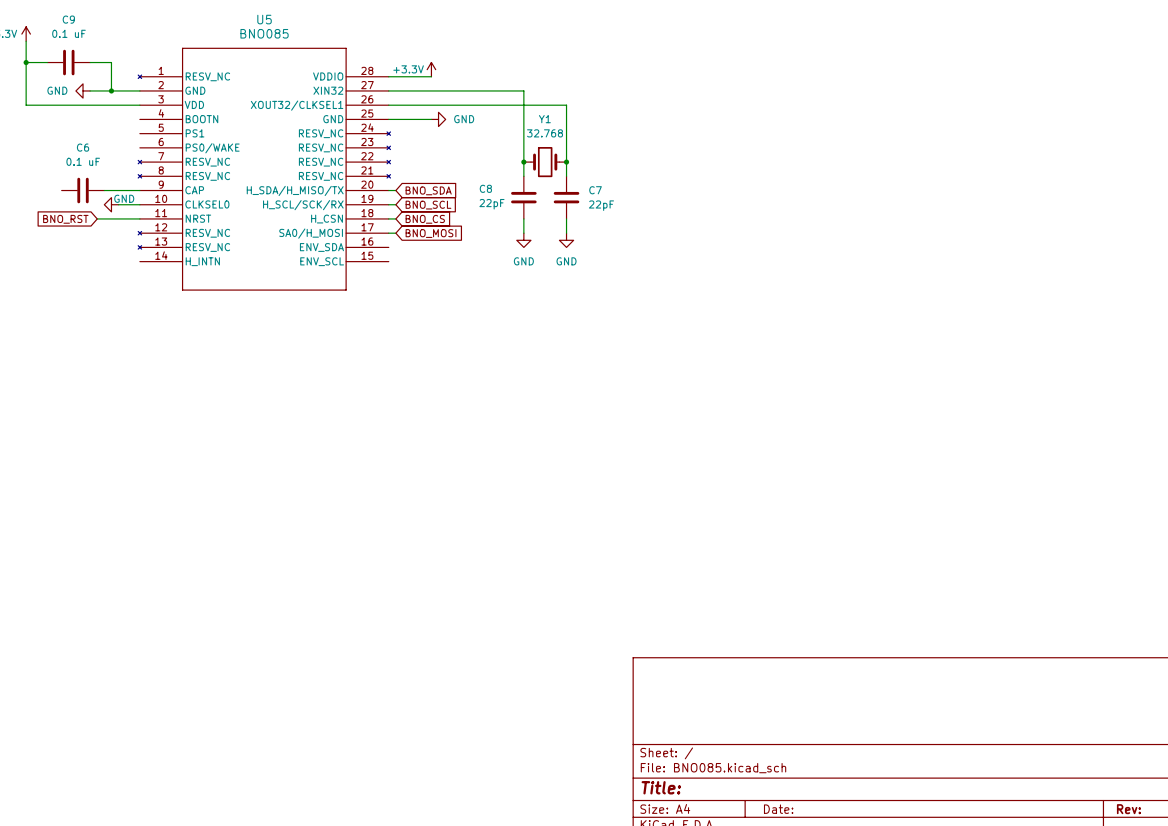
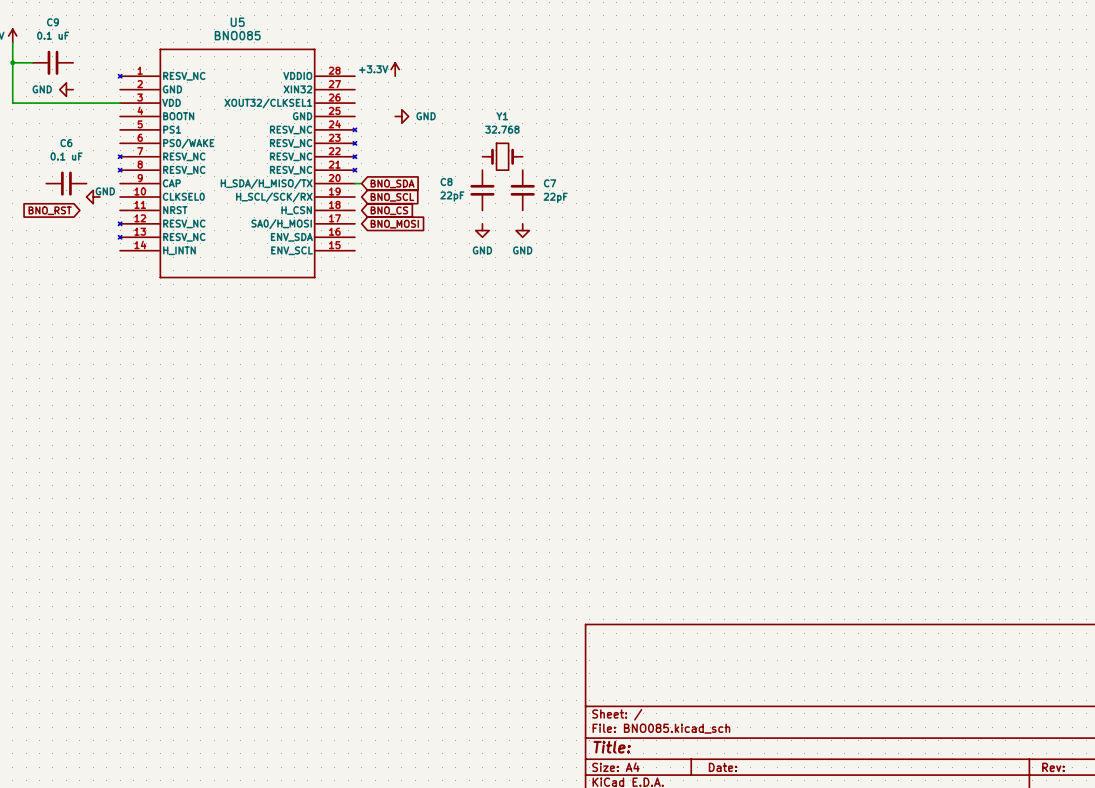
wire: (90, 62) (111, 62) (111, 90) -> none
wire: (388, 76) (431, 76) -> none
wire: (90, 90) (139, 90) -> none
junction: (111, 90) -> none
wire: (388, 90) (523, 90) (523, 176) -> none
wire: (388, 105) (566, 105) (566, 176) -> none
wire: (388, 119) (431, 119) -> none
junction: (523, 162) -> none
junction: (566, 162) -> none
wire: (104, 190) (139, 190) -> none
wire: (118, 204) (139, 204) -> none
wire: (388, 204) (395, 204) -> none
wire: (97, 218) (139, 218) -> none
wire: (388, 218) (395, 218) -> none
wire: (523, 218) (523, 233) -> none
wire: (566, 218) (566, 233) -> none
wire: (388, 233) (395, 233) -> none

